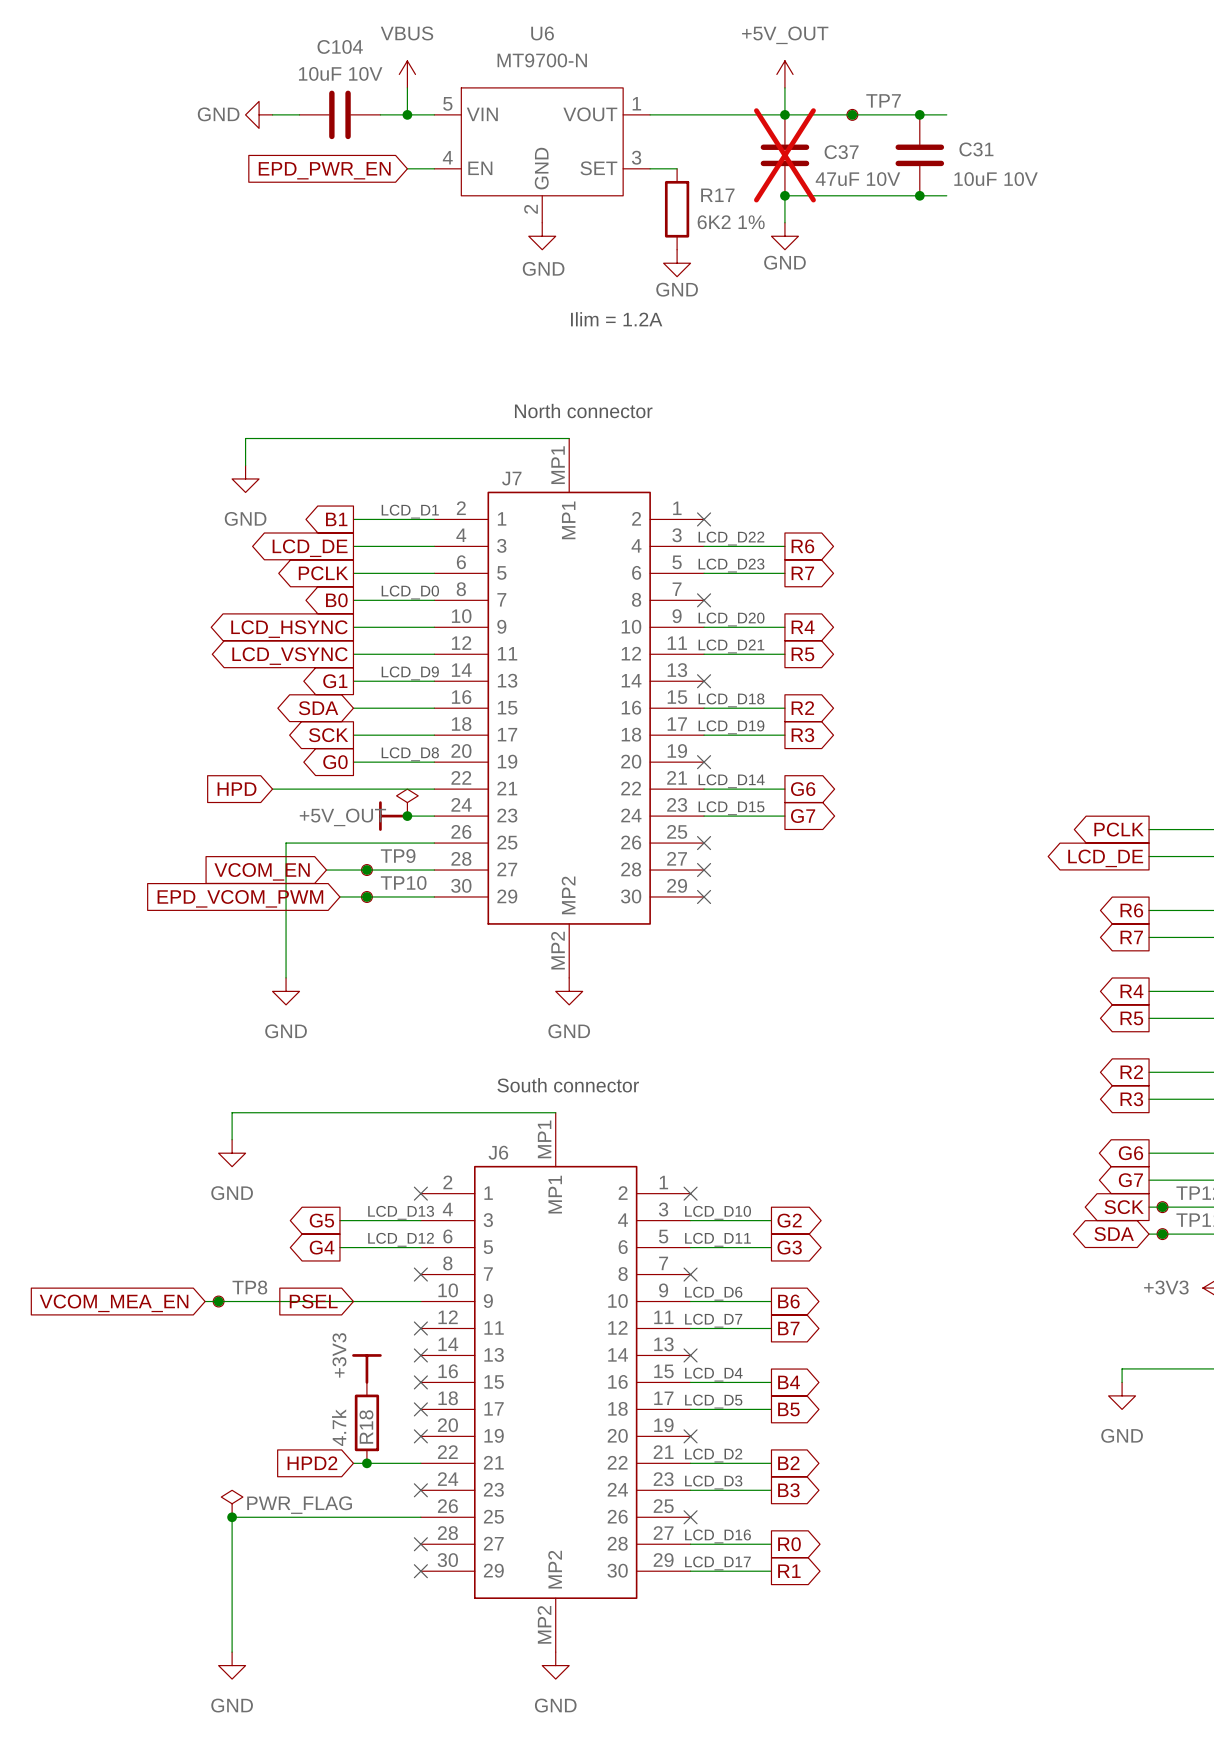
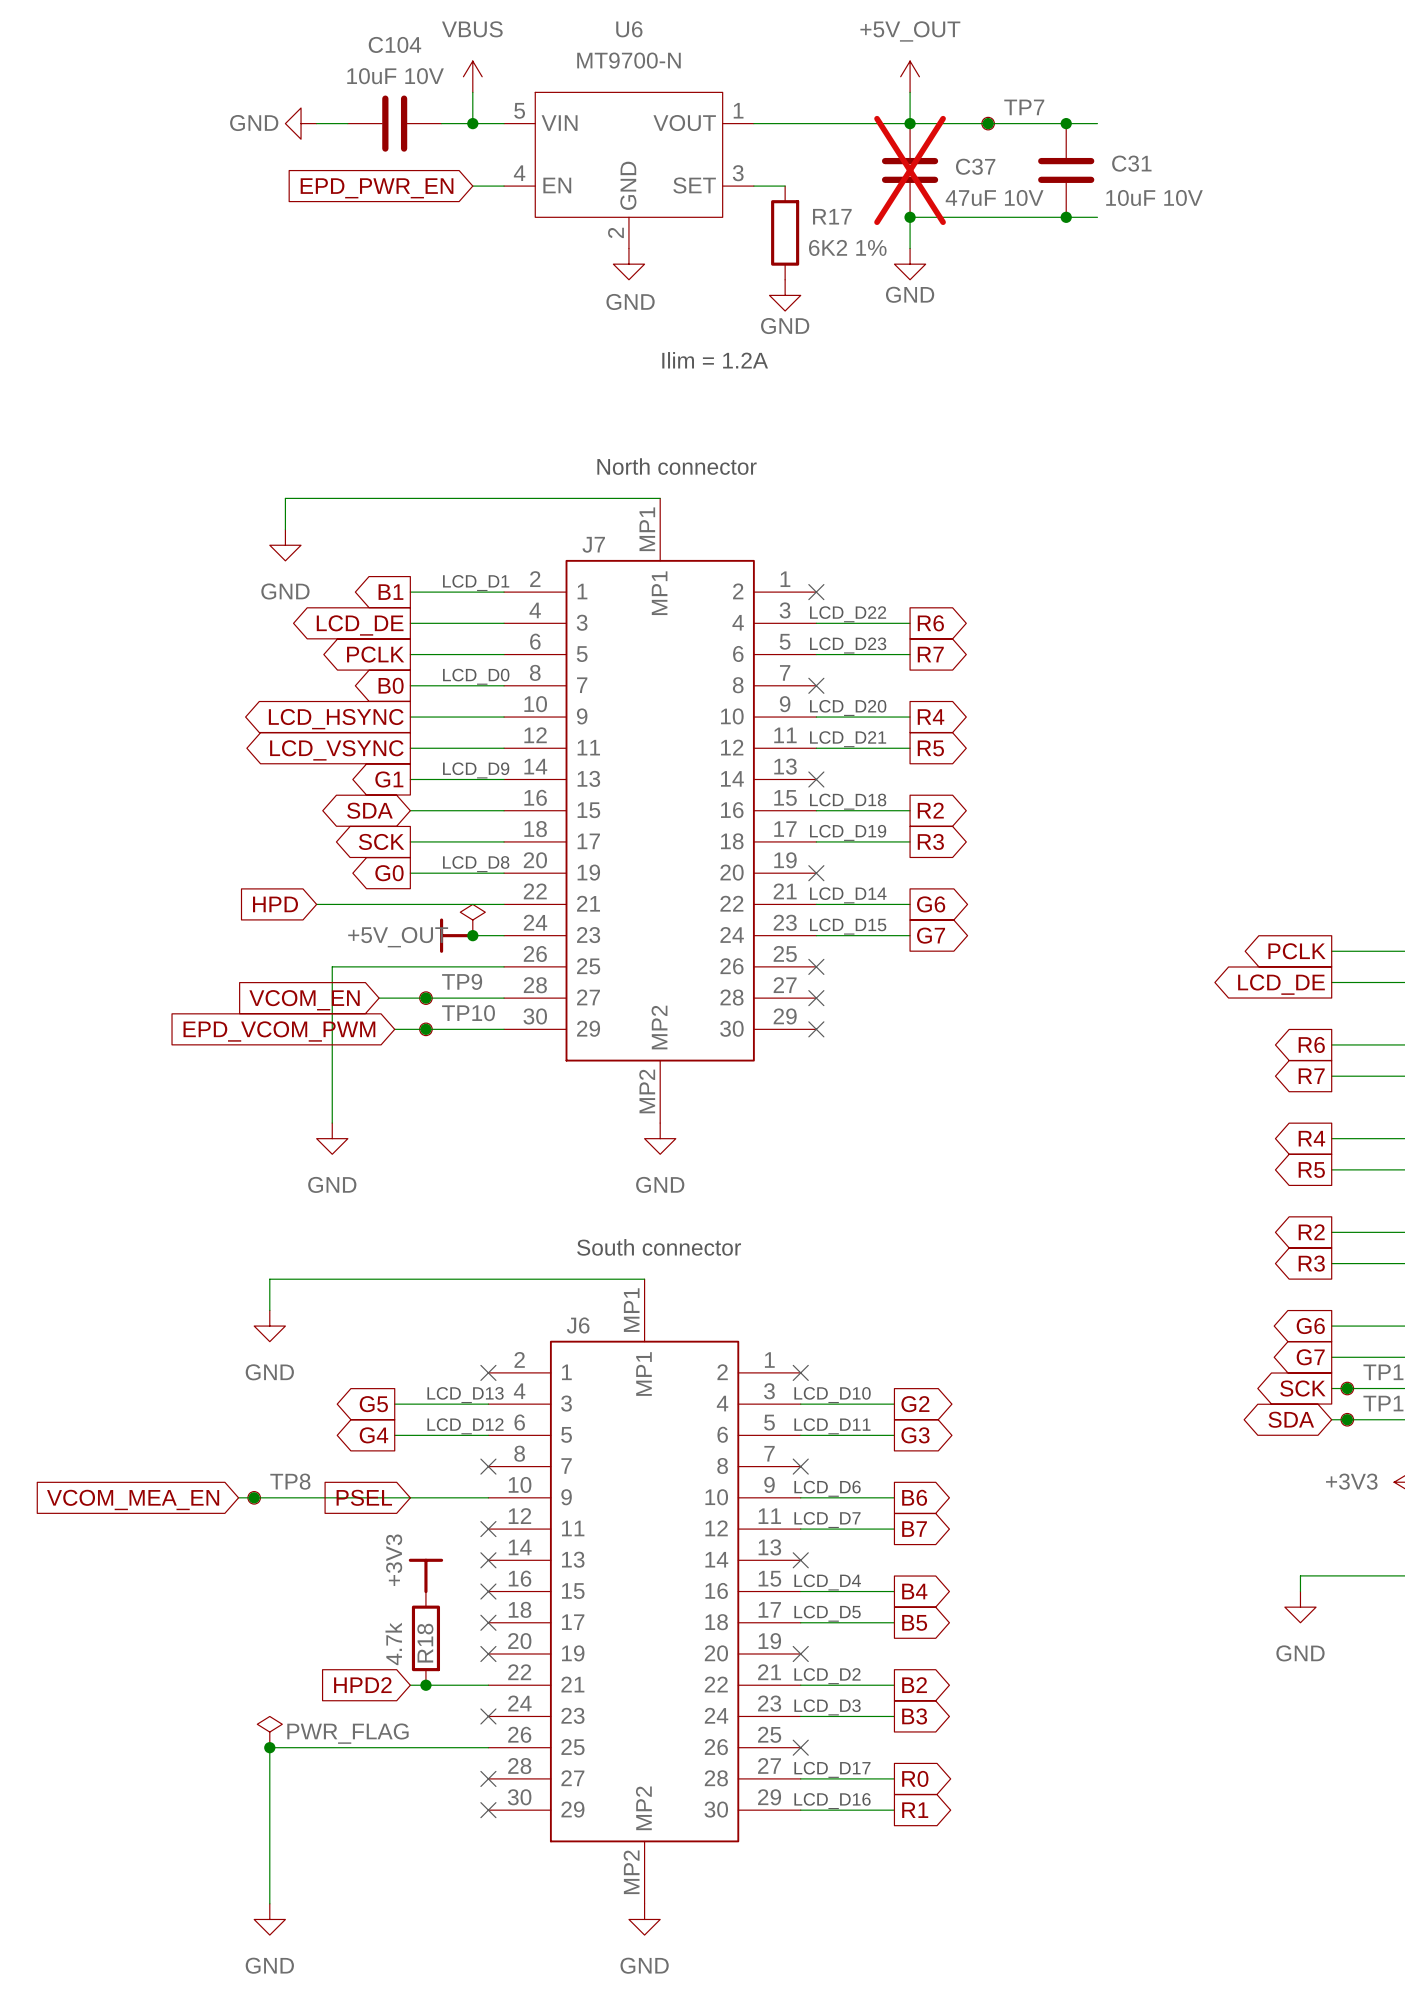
text: LCD_D16 (718, 1536) -> LCD_D17 (832, 1769)
text: LCD_D17 (717, 1563) -> LCD_D16 (832, 1801)

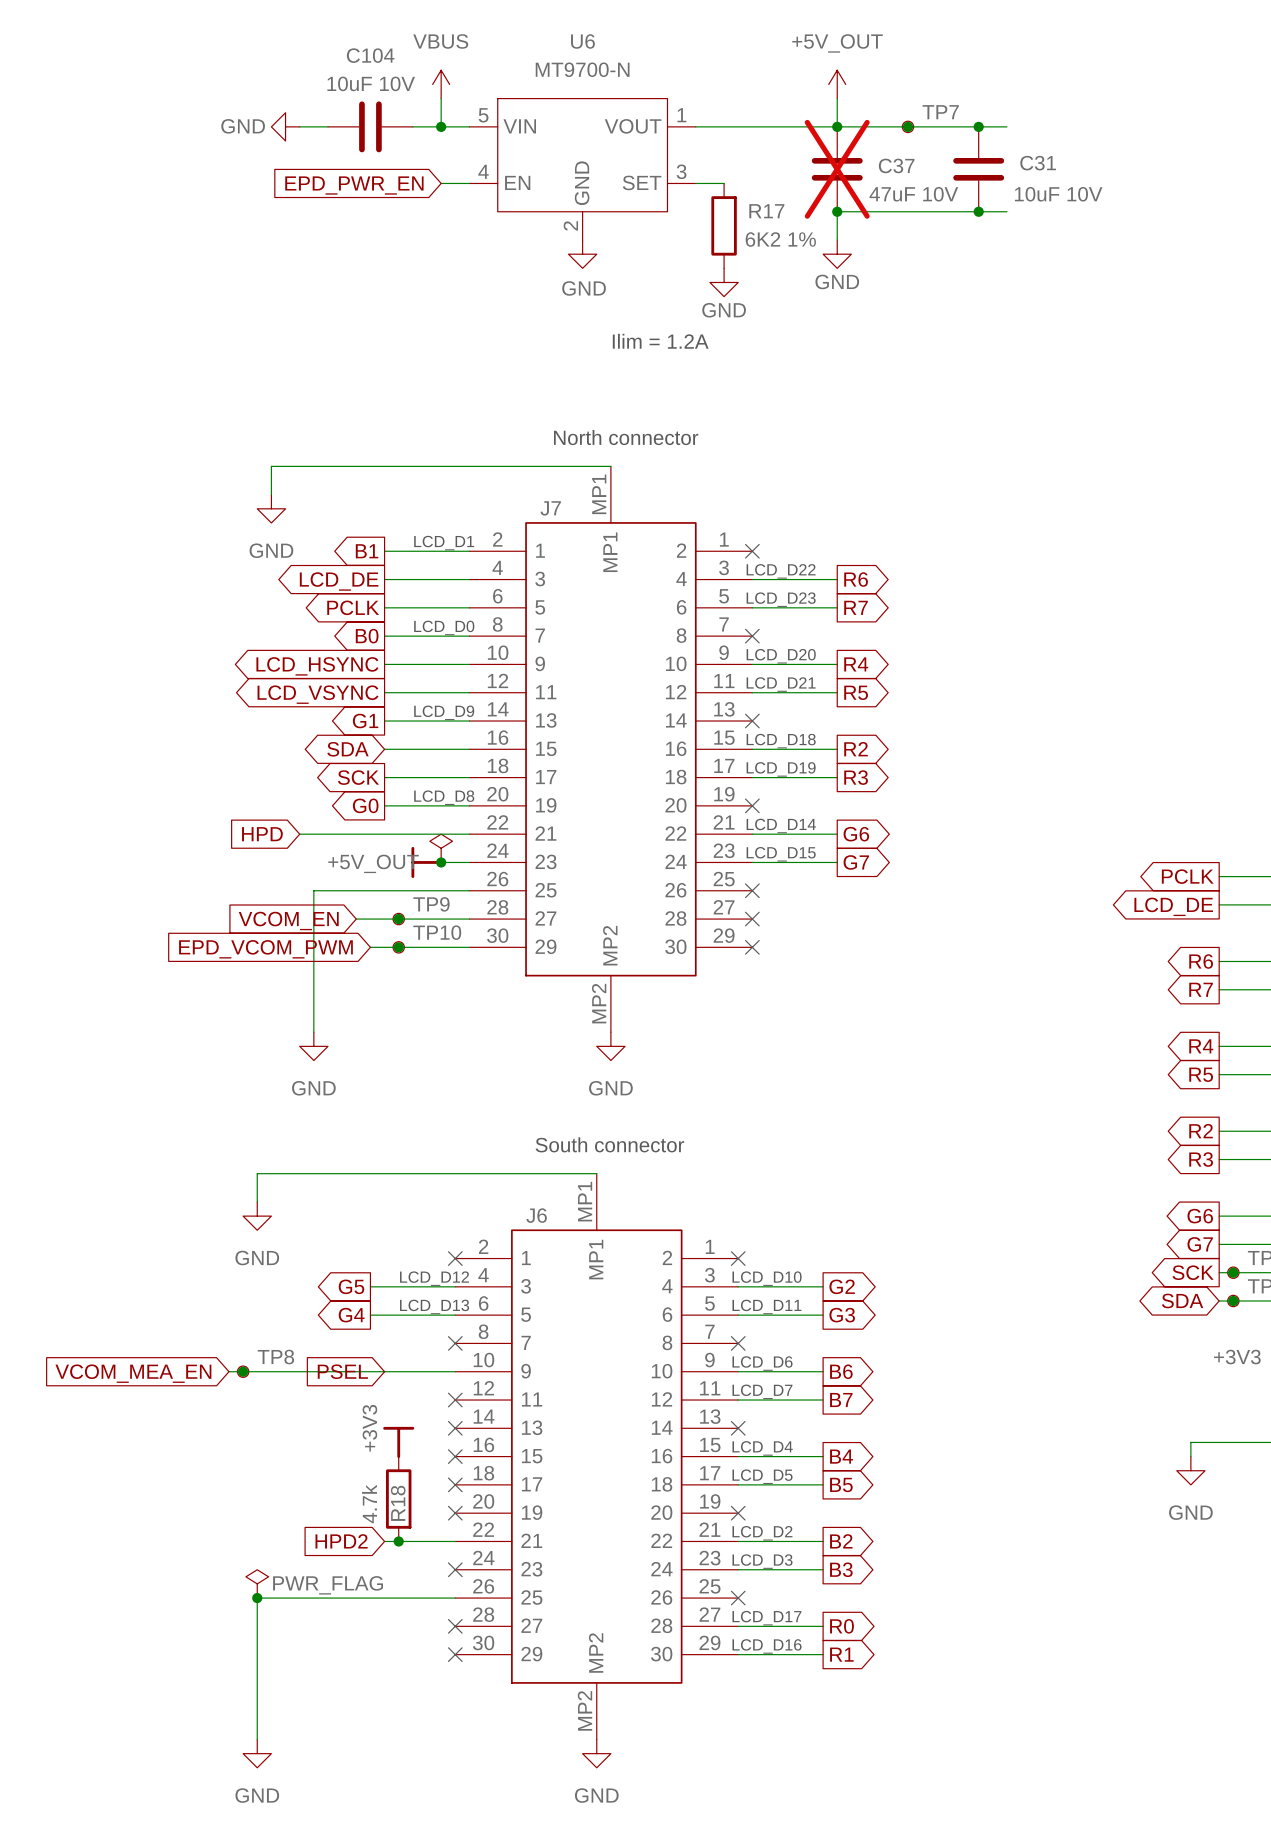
text: LCD_D13 (465, 1395) -> LCD_D12 (434, 1278)
text: LCD_D12 (465, 1426) -> LCD_D13 (434, 1306)

